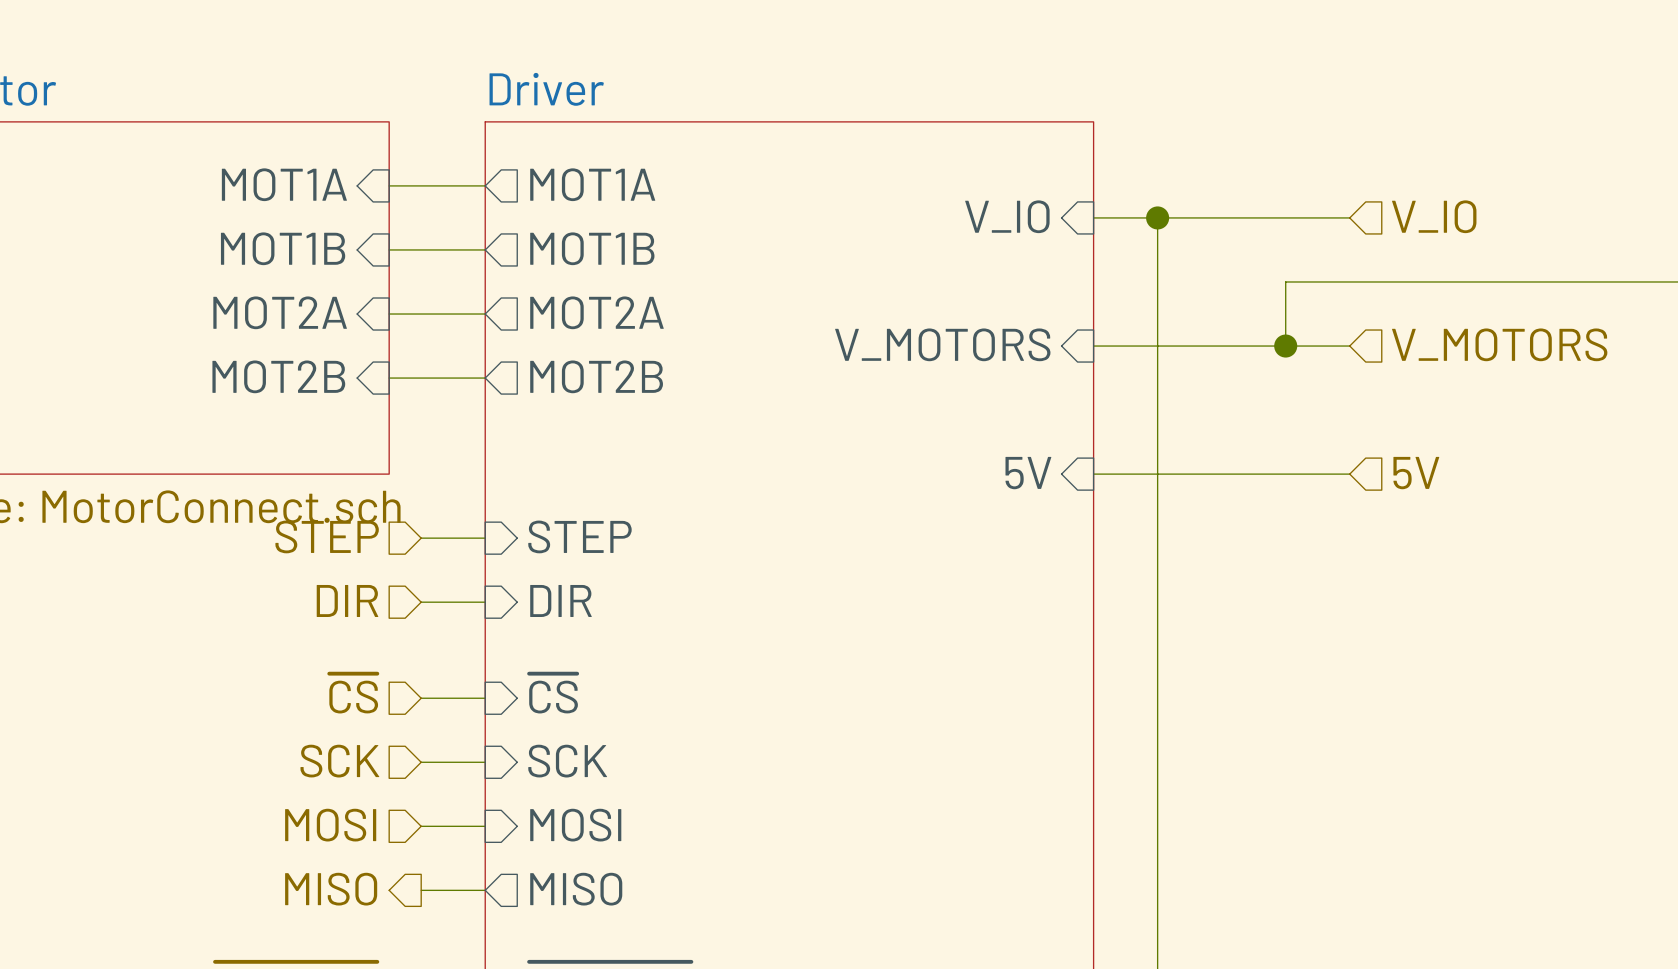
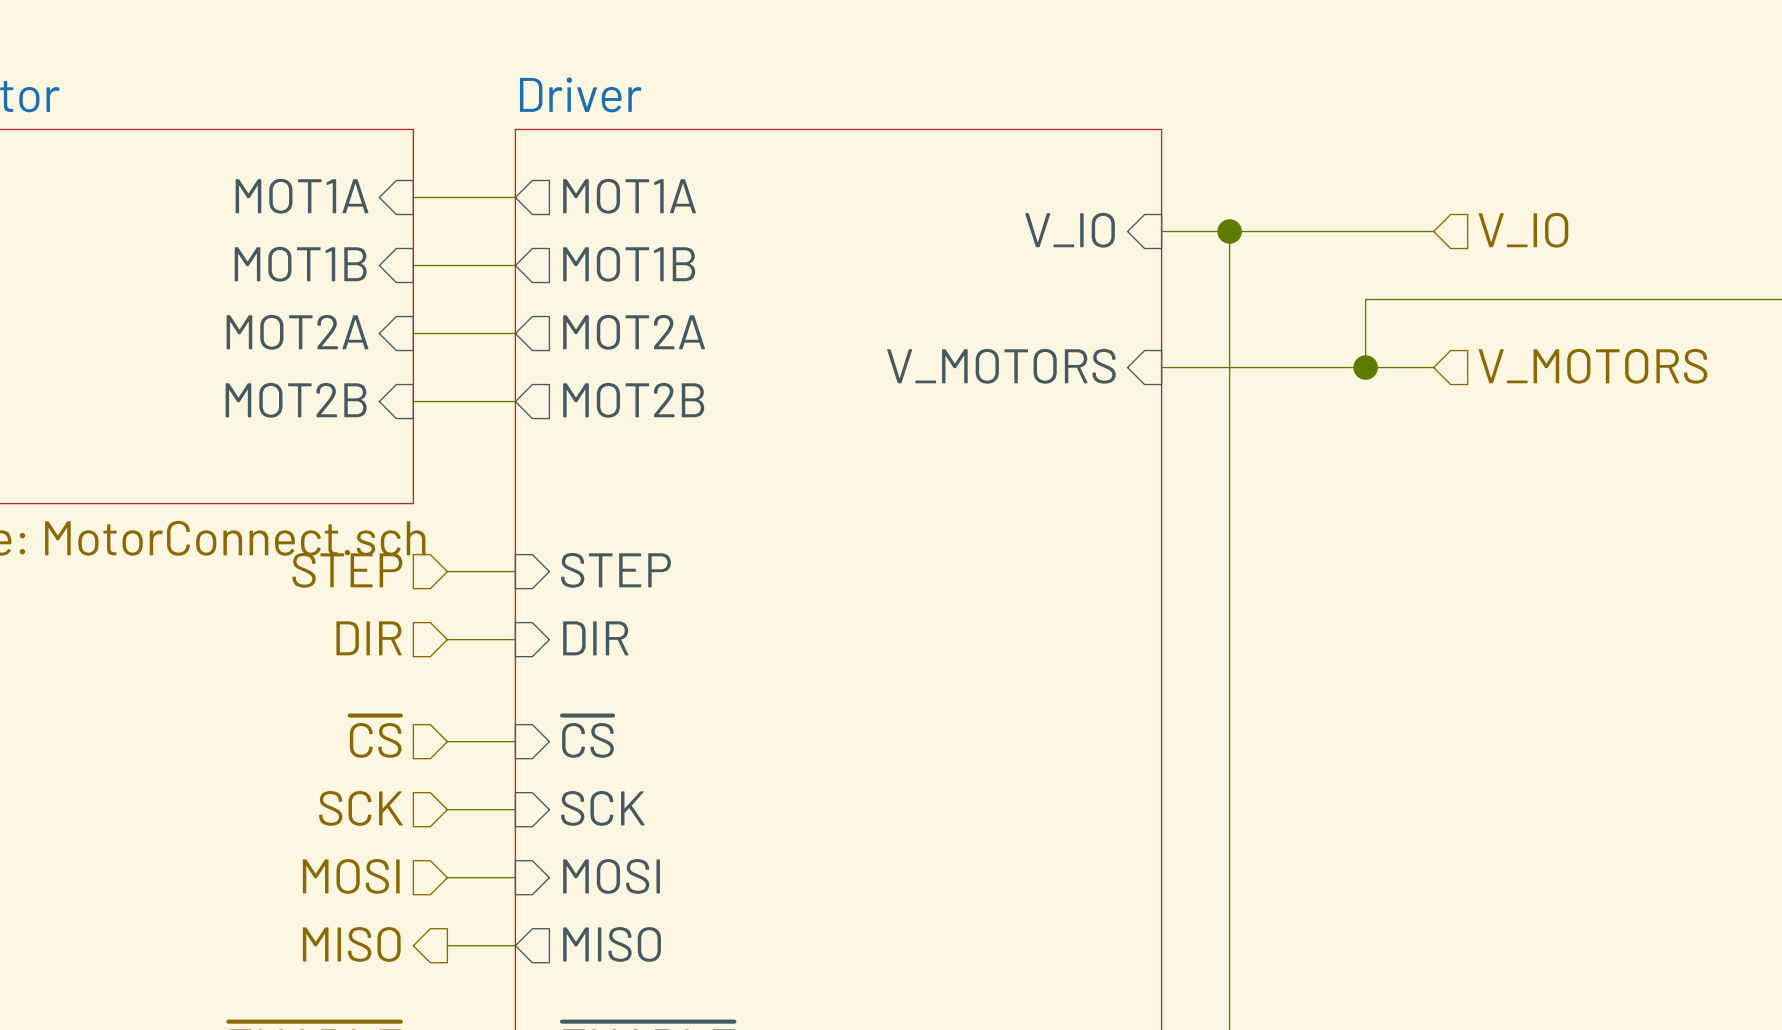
sheet pin: 5V (1028, 473) -> none
hierarchical label: 5V (1416, 473) -> none
wire: (1093, 474) (1349, 474) -> none

